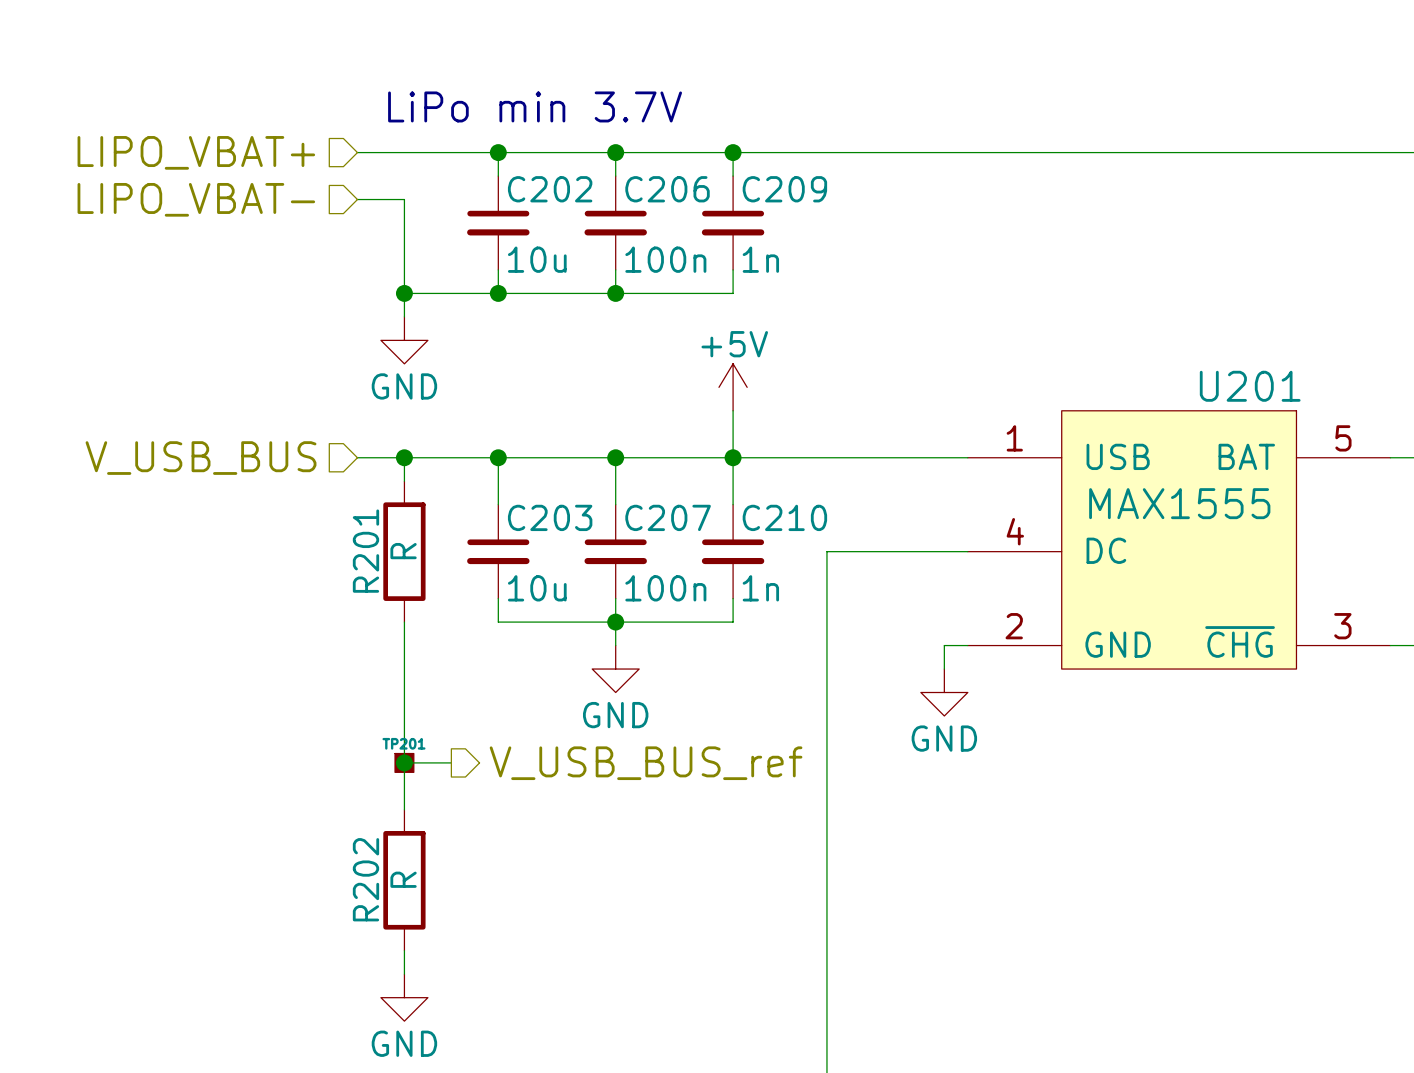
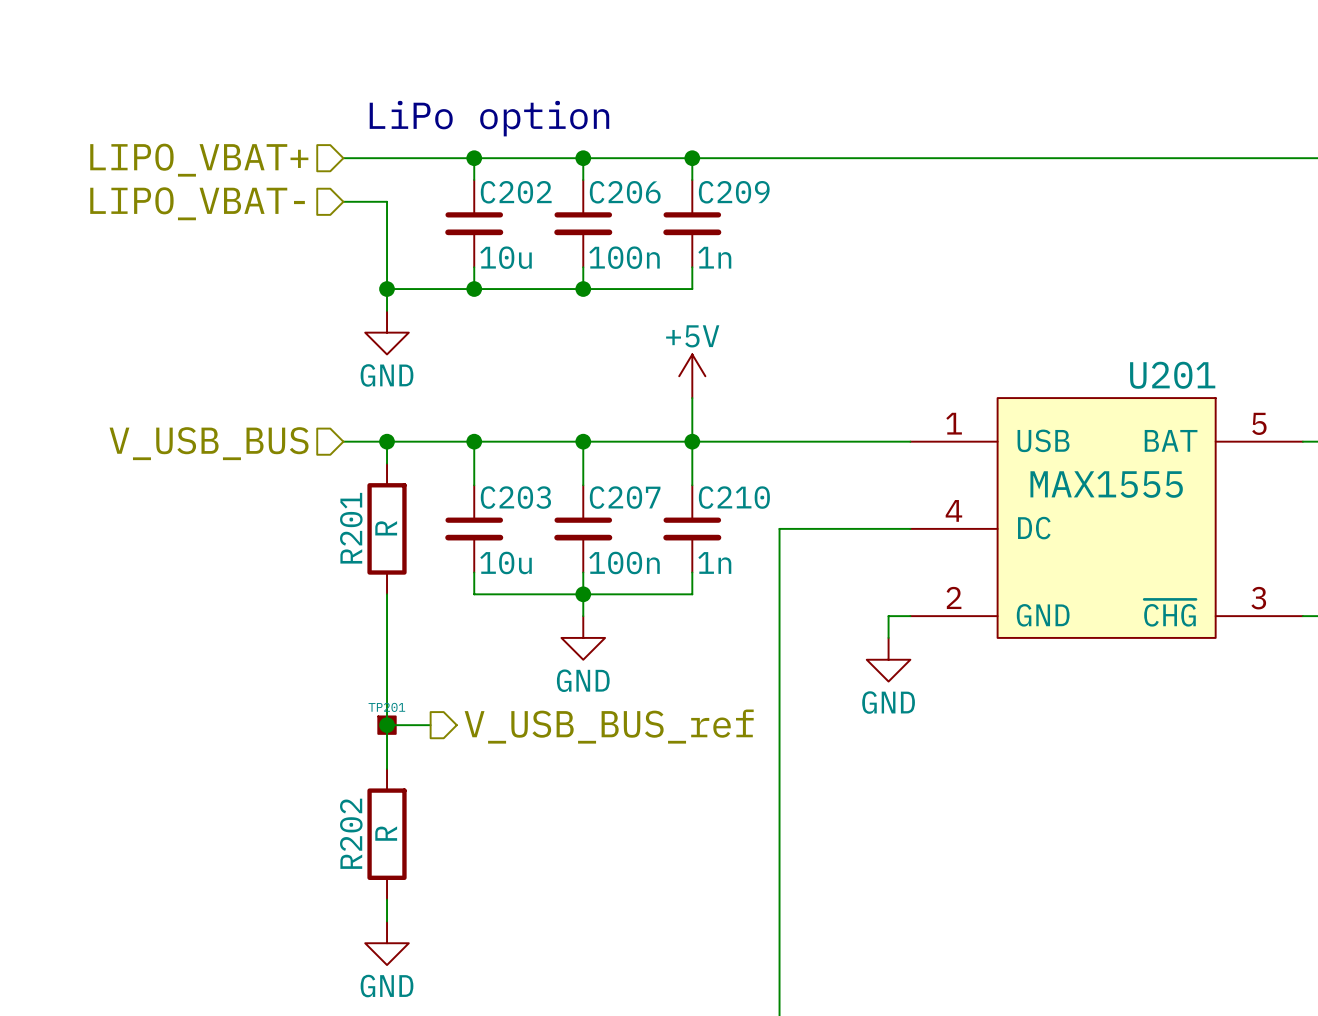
text: LiPo min 3.7V (535, 106) -> LiPo option (489, 118)

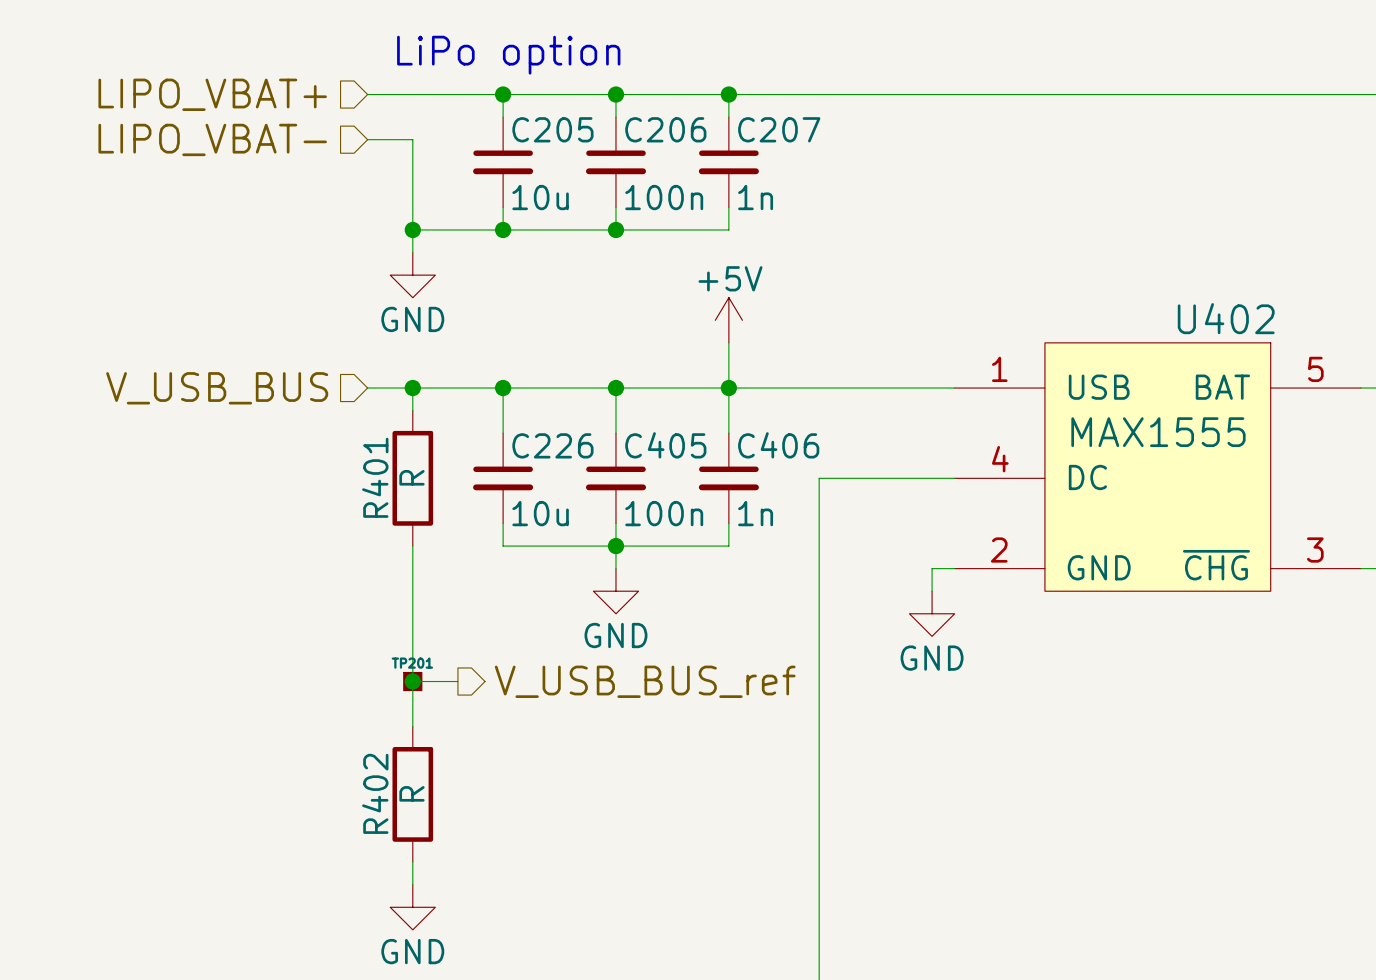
C202 name: C202 (516, 192) -> C205 (552, 129)
C209 name: C209 (734, 192) -> C207 (779, 129)
U201 name: U201 (1172, 375) -> U402 (1226, 318)
C203 name: C203 (515, 497) -> C226 (552, 445)
C207 name: C207 (625, 497) -> C405 (665, 445)
C210 name: C210 (734, 497) -> C406 (778, 445)
R201 name: R201 (351, 528) -> R401 (375, 477)
R202 name: R202 (351, 833) -> R402 (375, 793)

